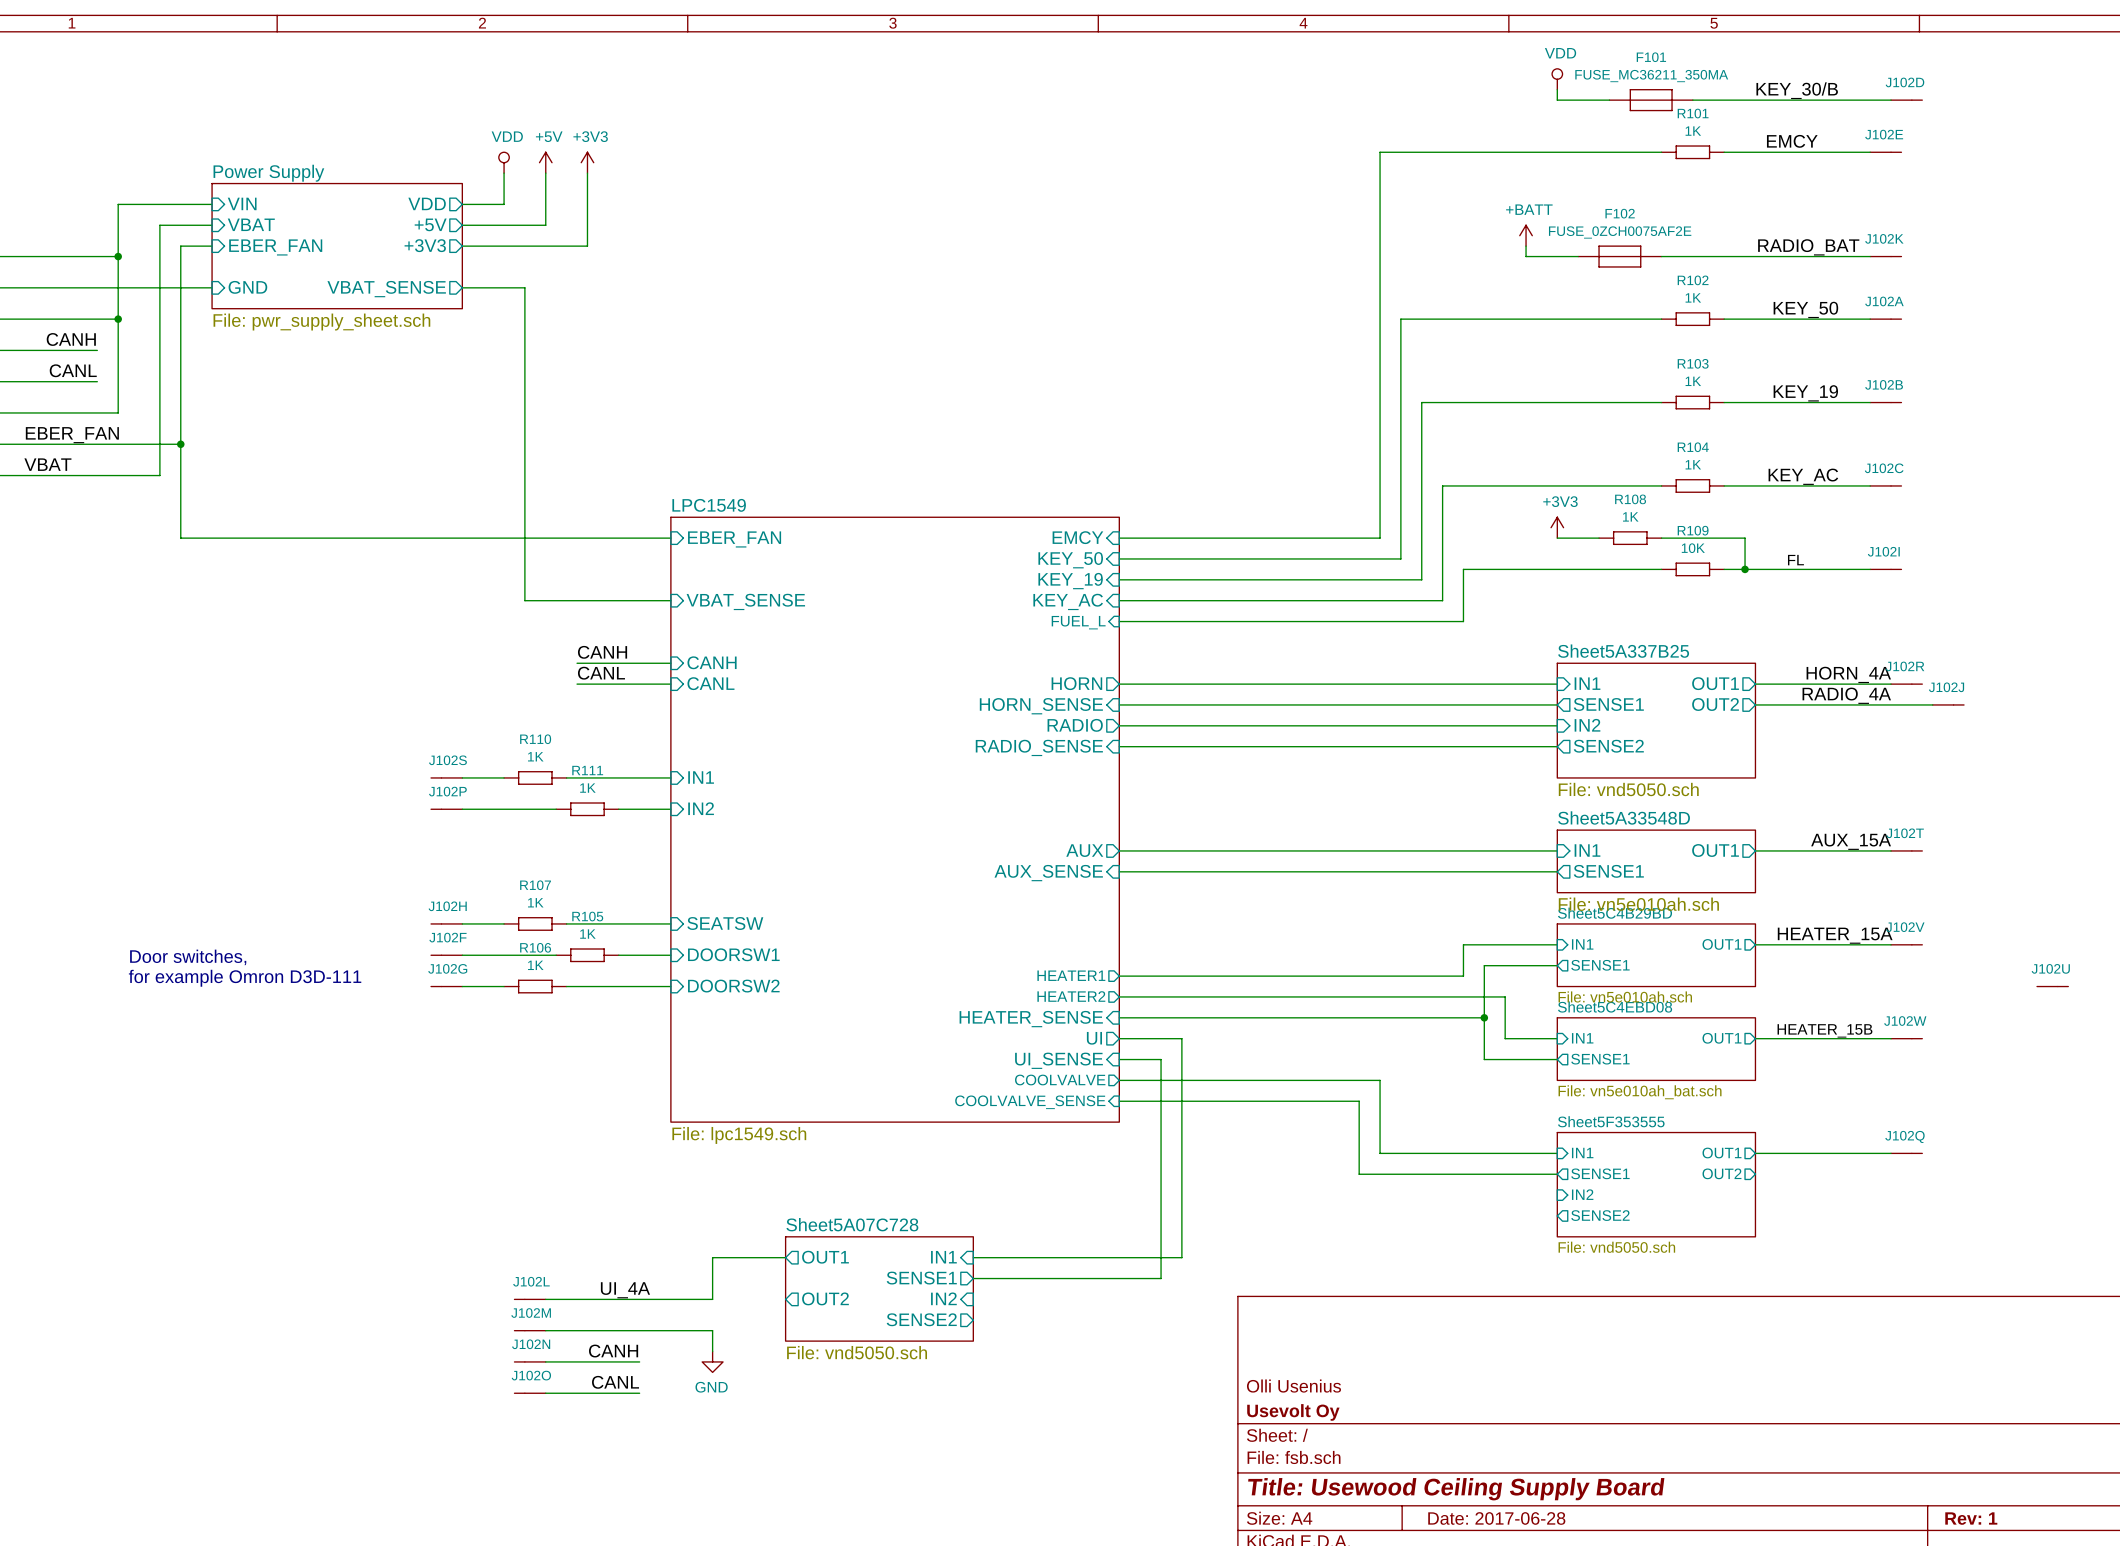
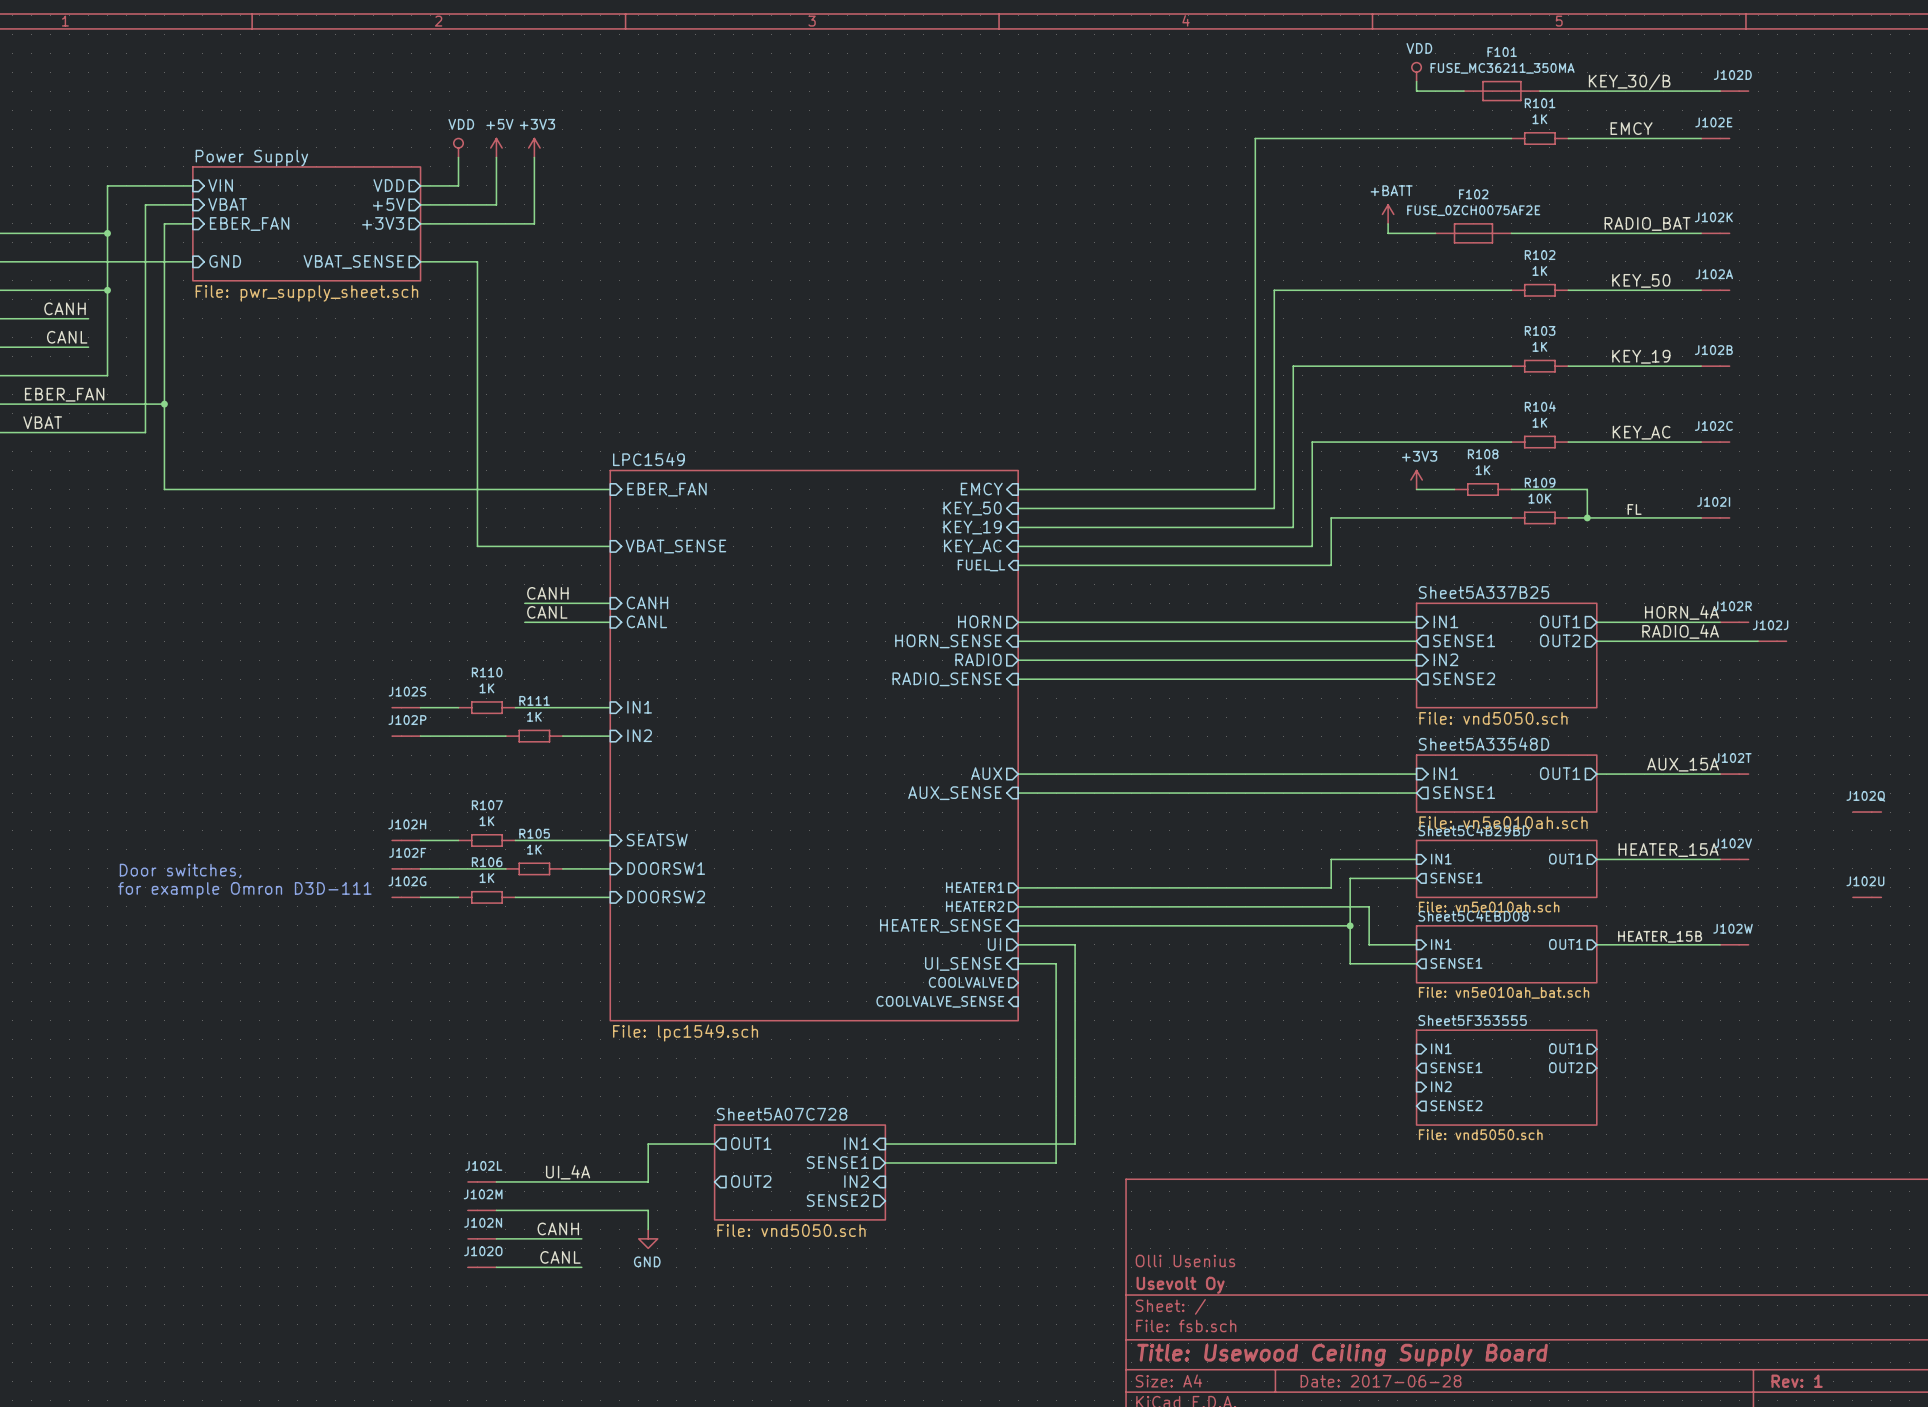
wire: (1119, 1080) (1380, 1080) (1380, 1153) (1557, 1153) -> none
wire: (1119, 1101) (1359, 1101) (1359, 1174) (1557, 1174) -> none
wire: (1755, 1153) (1891, 1153) -> none
J102Q position: (1906, 1153) -> (1867, 812)

